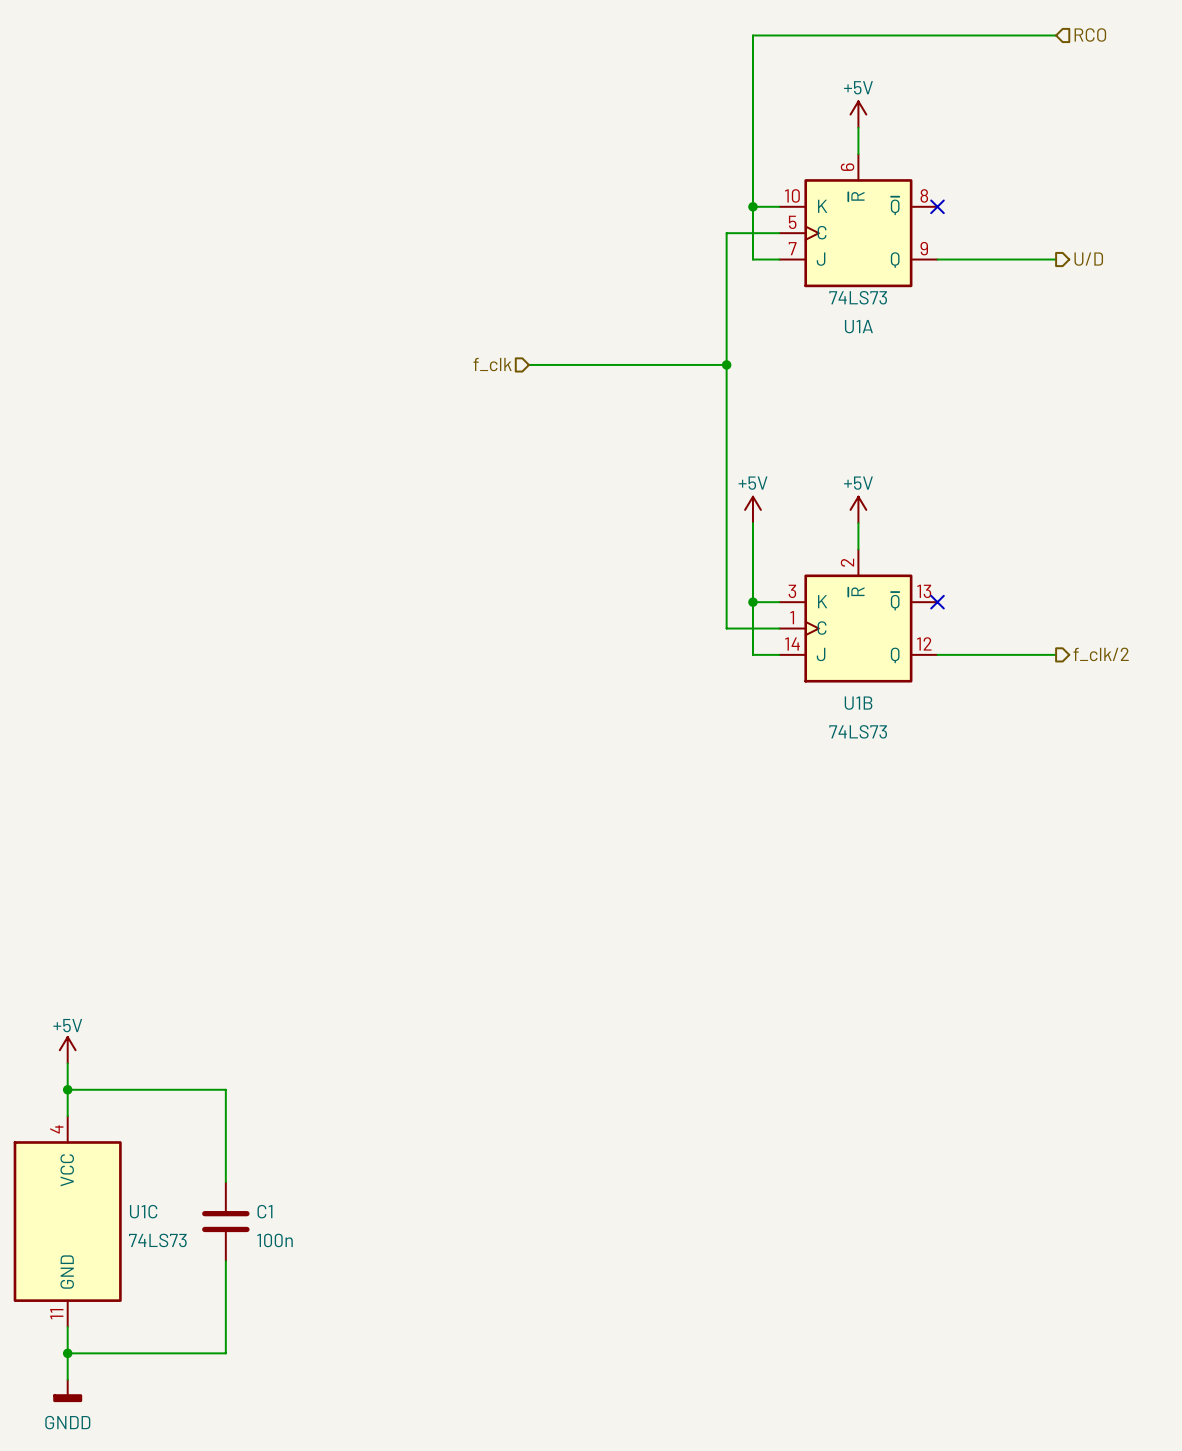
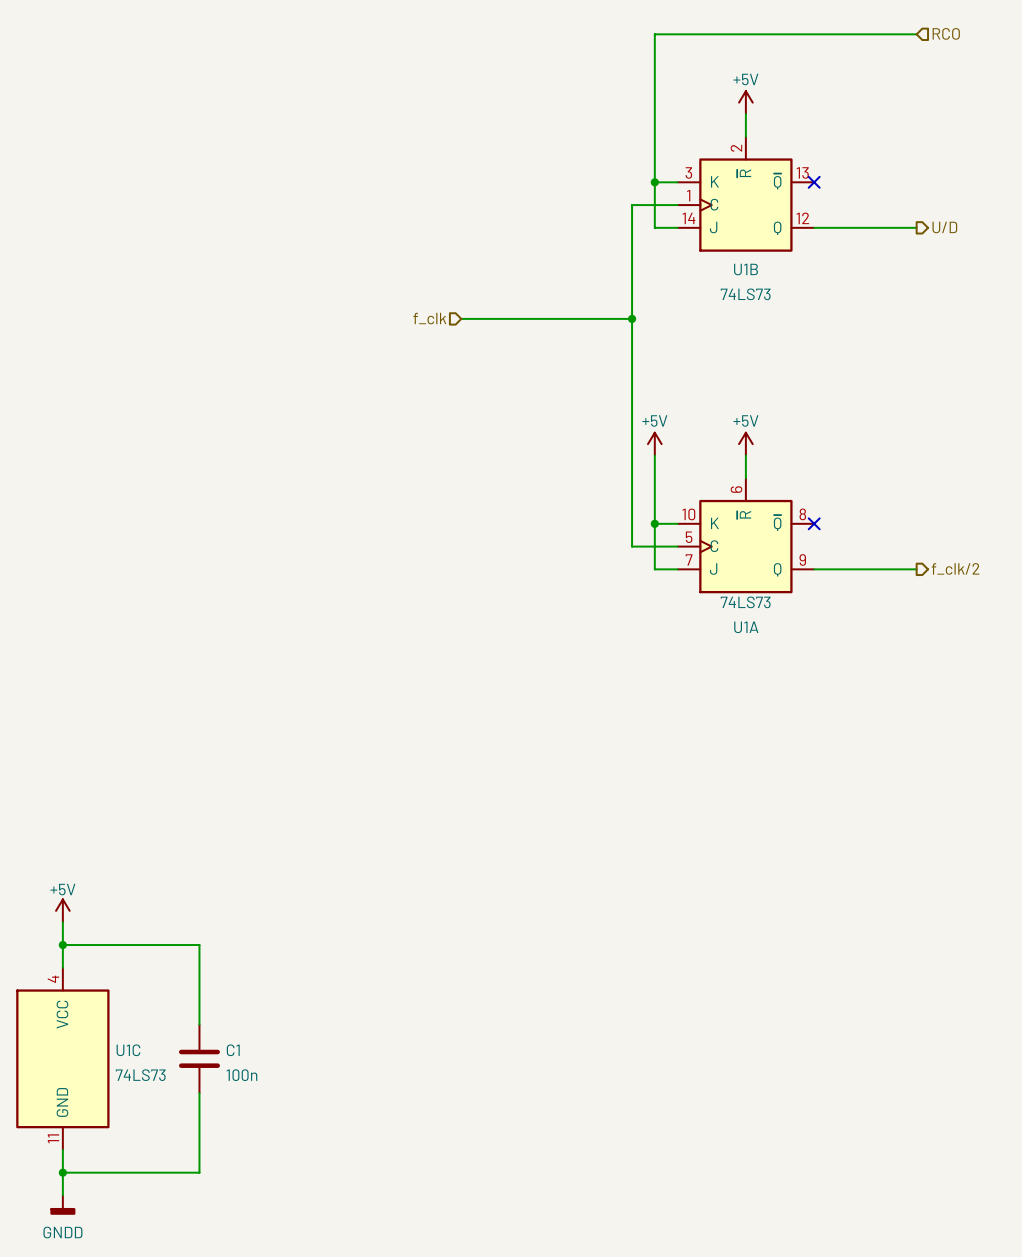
U1A position: (858, 220) -> (745, 535)
U1B position: (858, 616) -> (745, 194)

